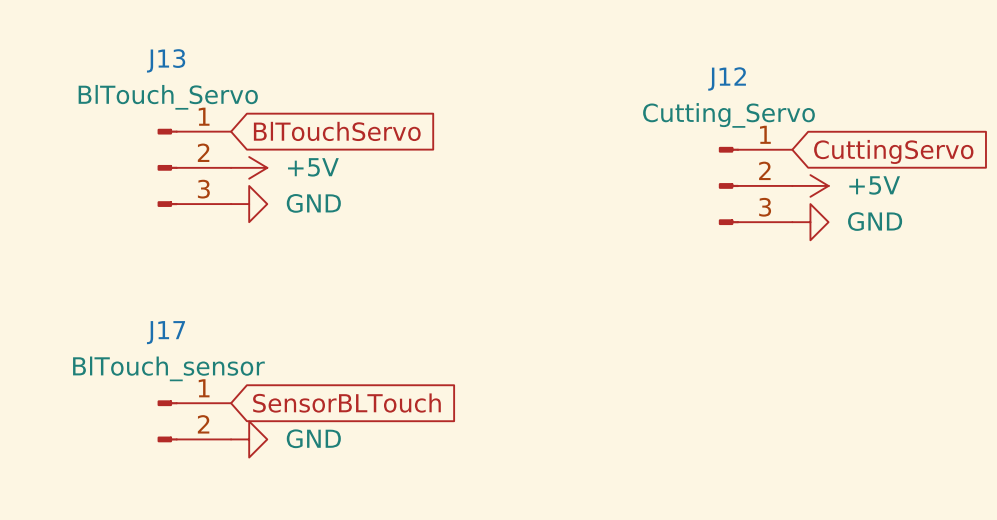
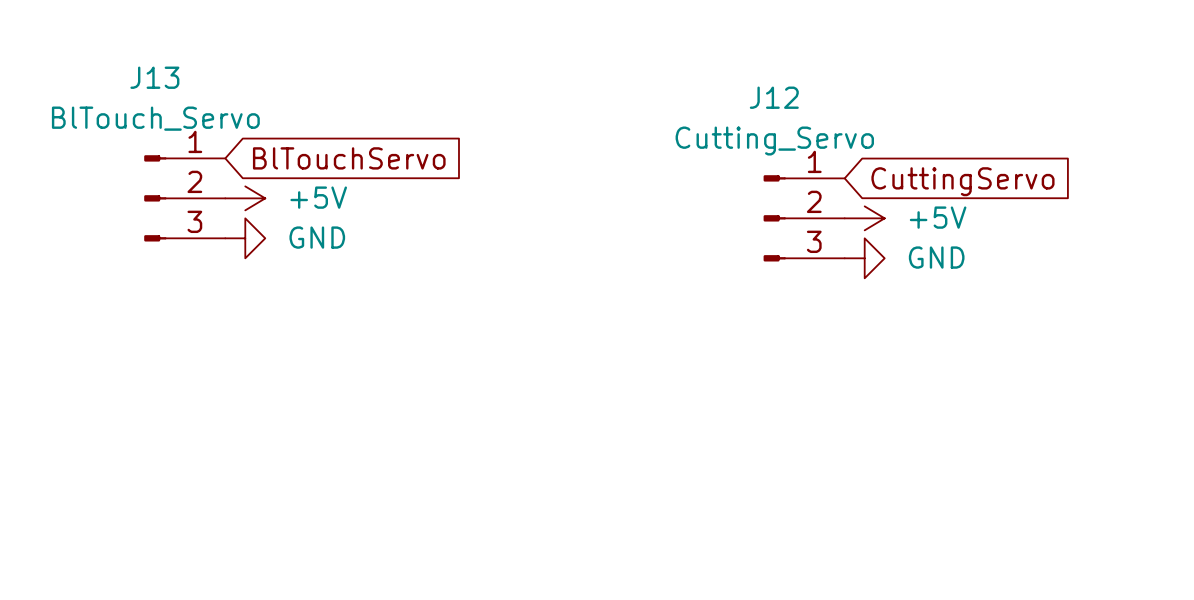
global label: SensorBLTouch (346, 403) -> none
J17: BlTouch_sensor (194, 421) -> none
power symbol: GND (249, 439) -> none

